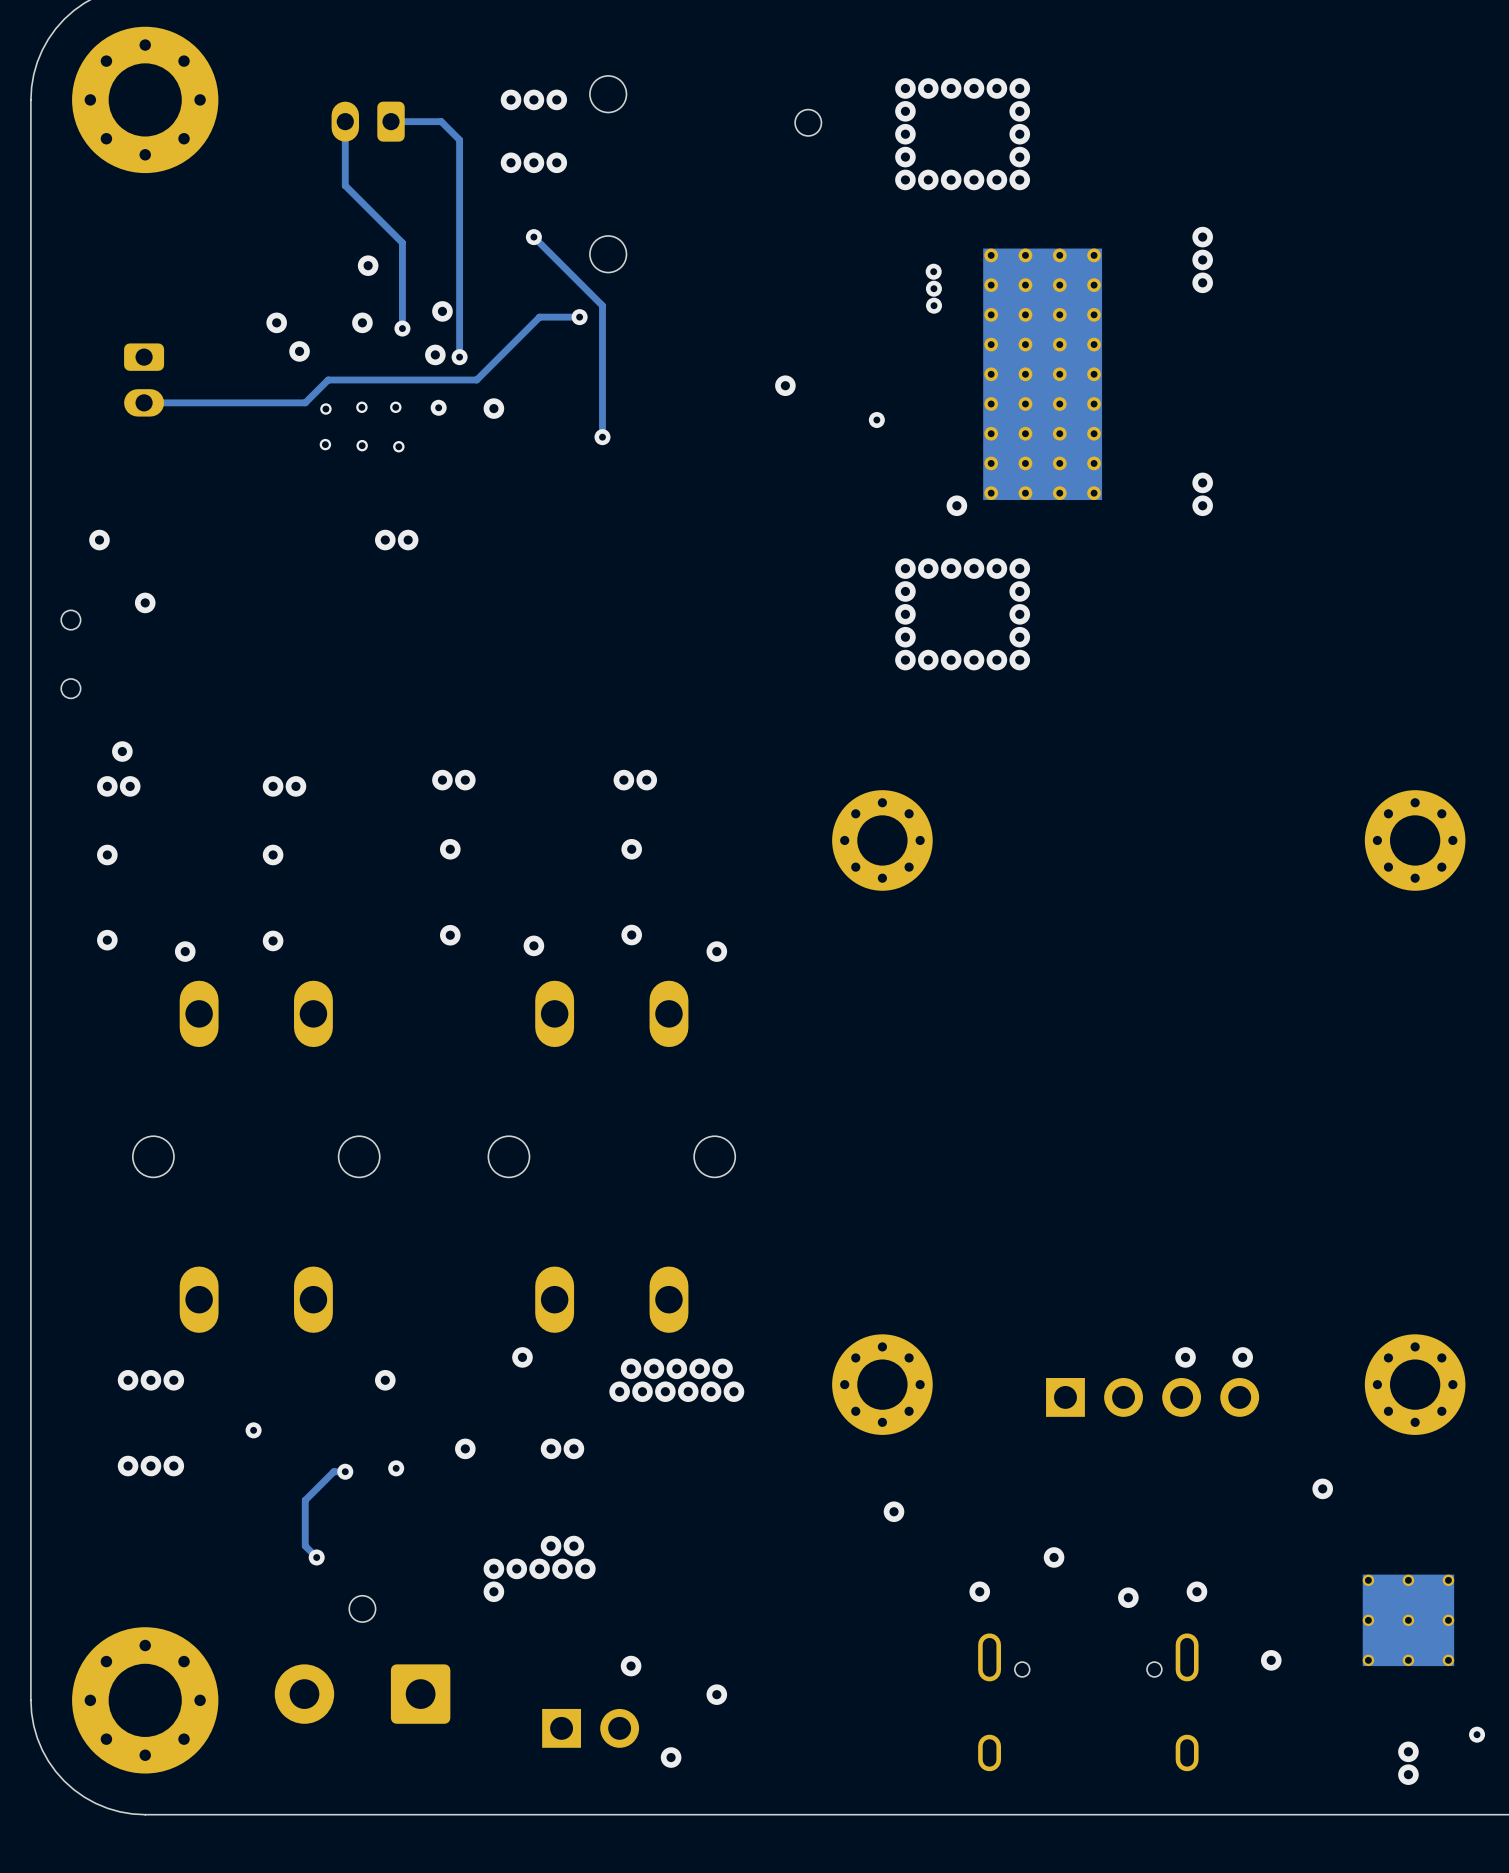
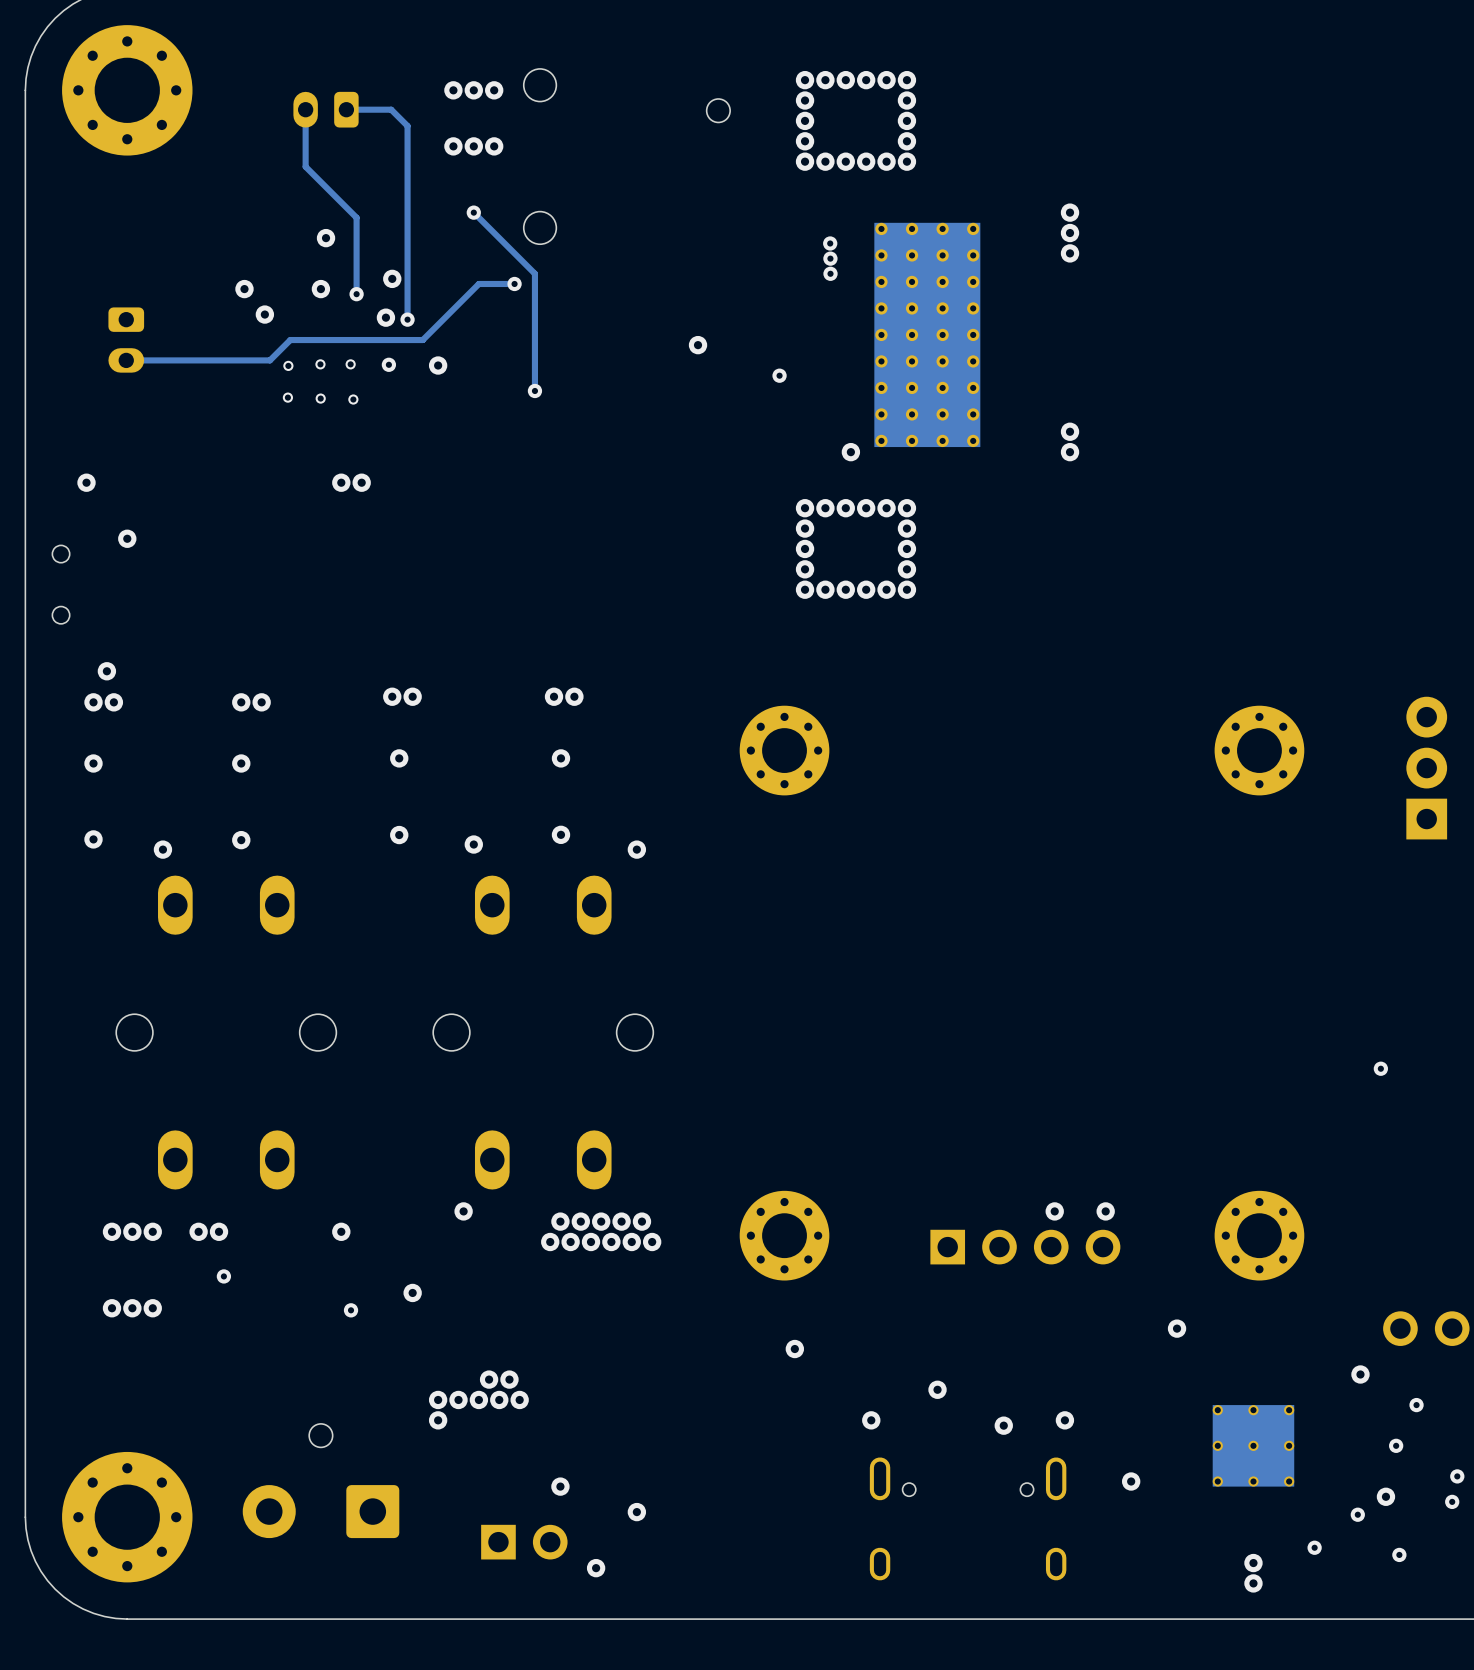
via: none -> (198, 1231)
via: none -> (219, 1231)
via: (551, 1448) -> none
via: (573, 1448) -> none
track: (345, 1471) (333, 1471) (305, 1500) (305, 1546) (316, 1557) -> none
via: (345, 1471) -> none
via: (316, 1557) -> none

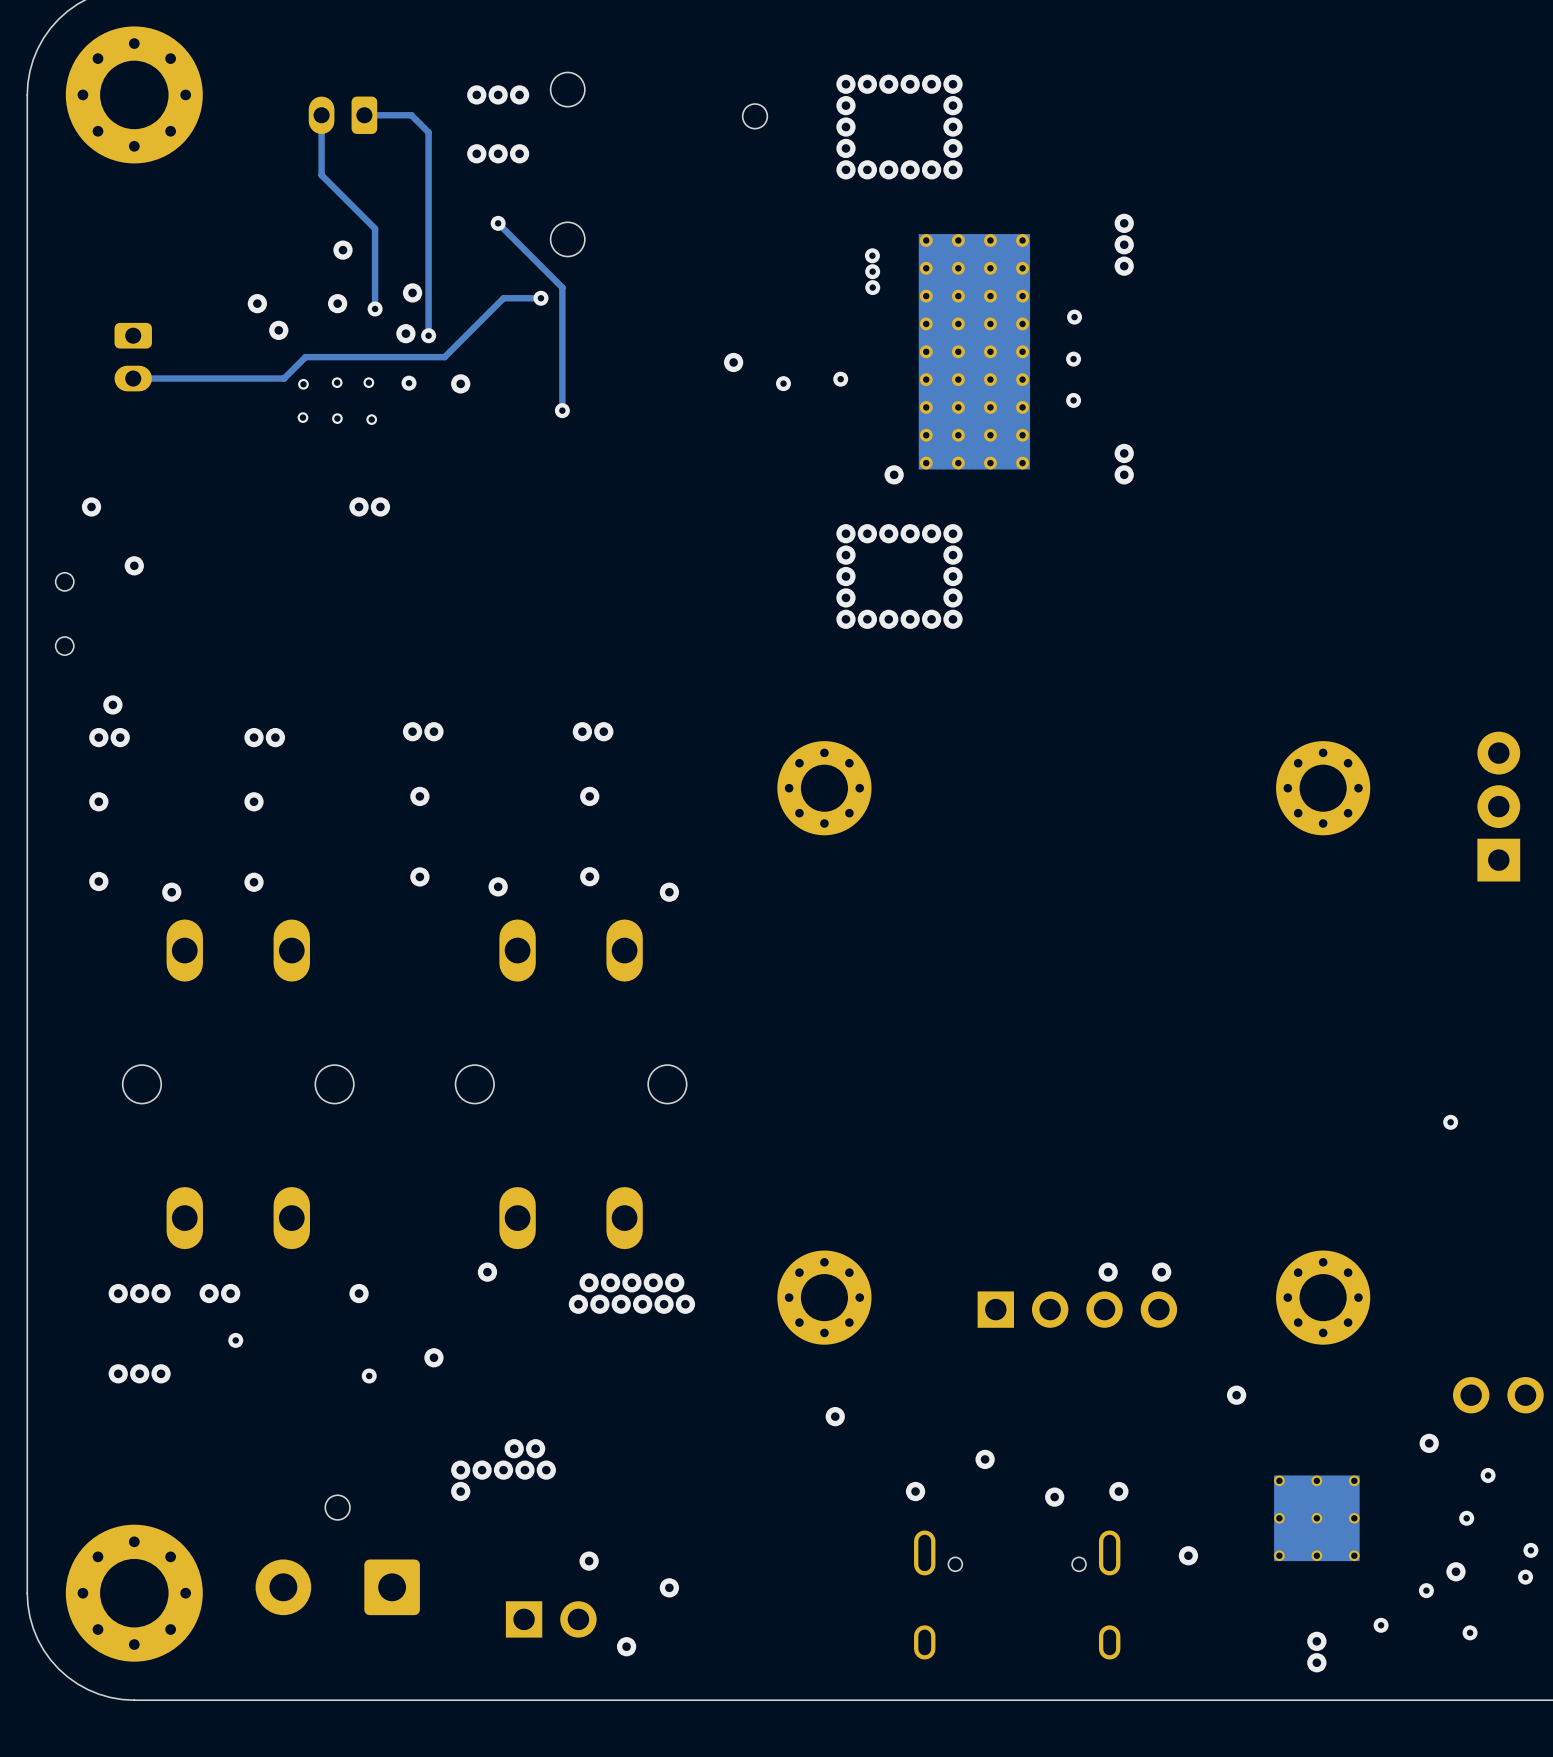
via: none -> (1074, 317)
via: none -> (1073, 359)
via: none -> (840, 379)
via: none -> (783, 383)
via: (779, 375) -> none
via: none -> (1073, 400)

